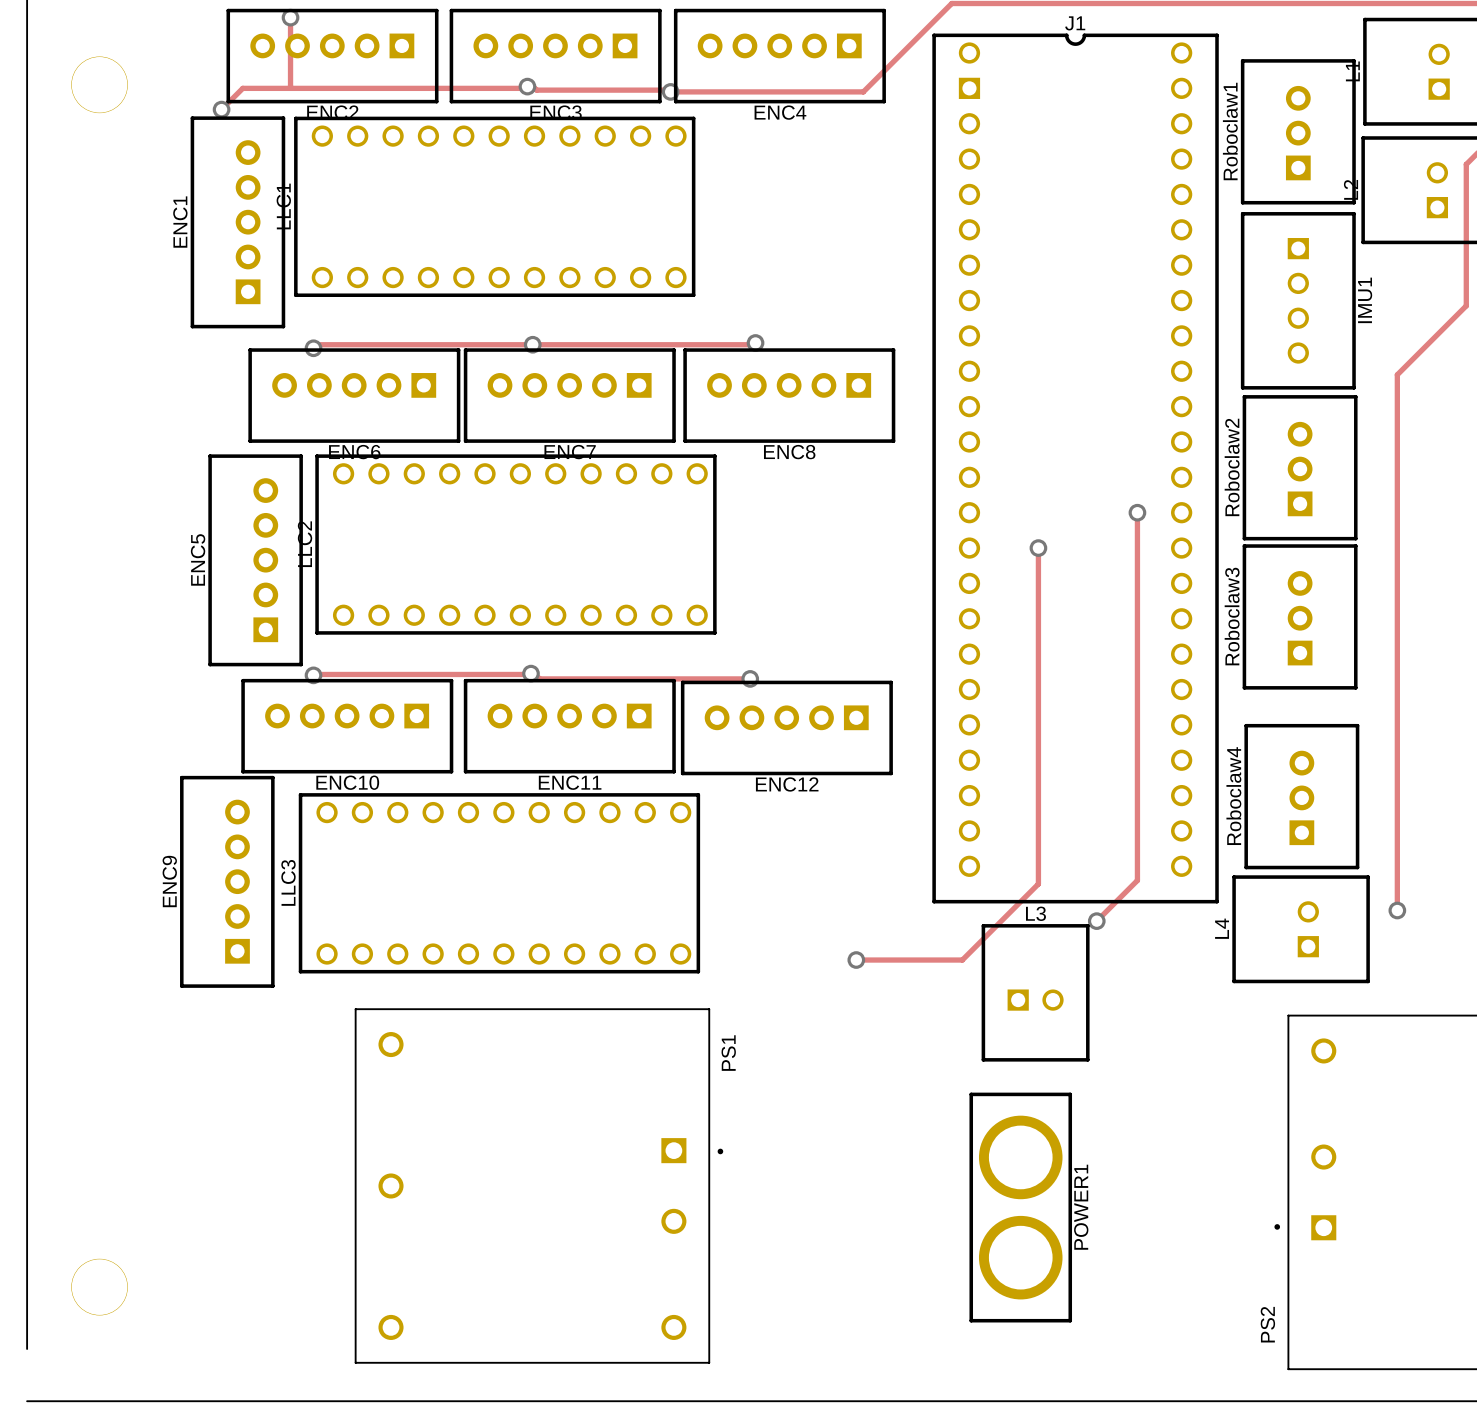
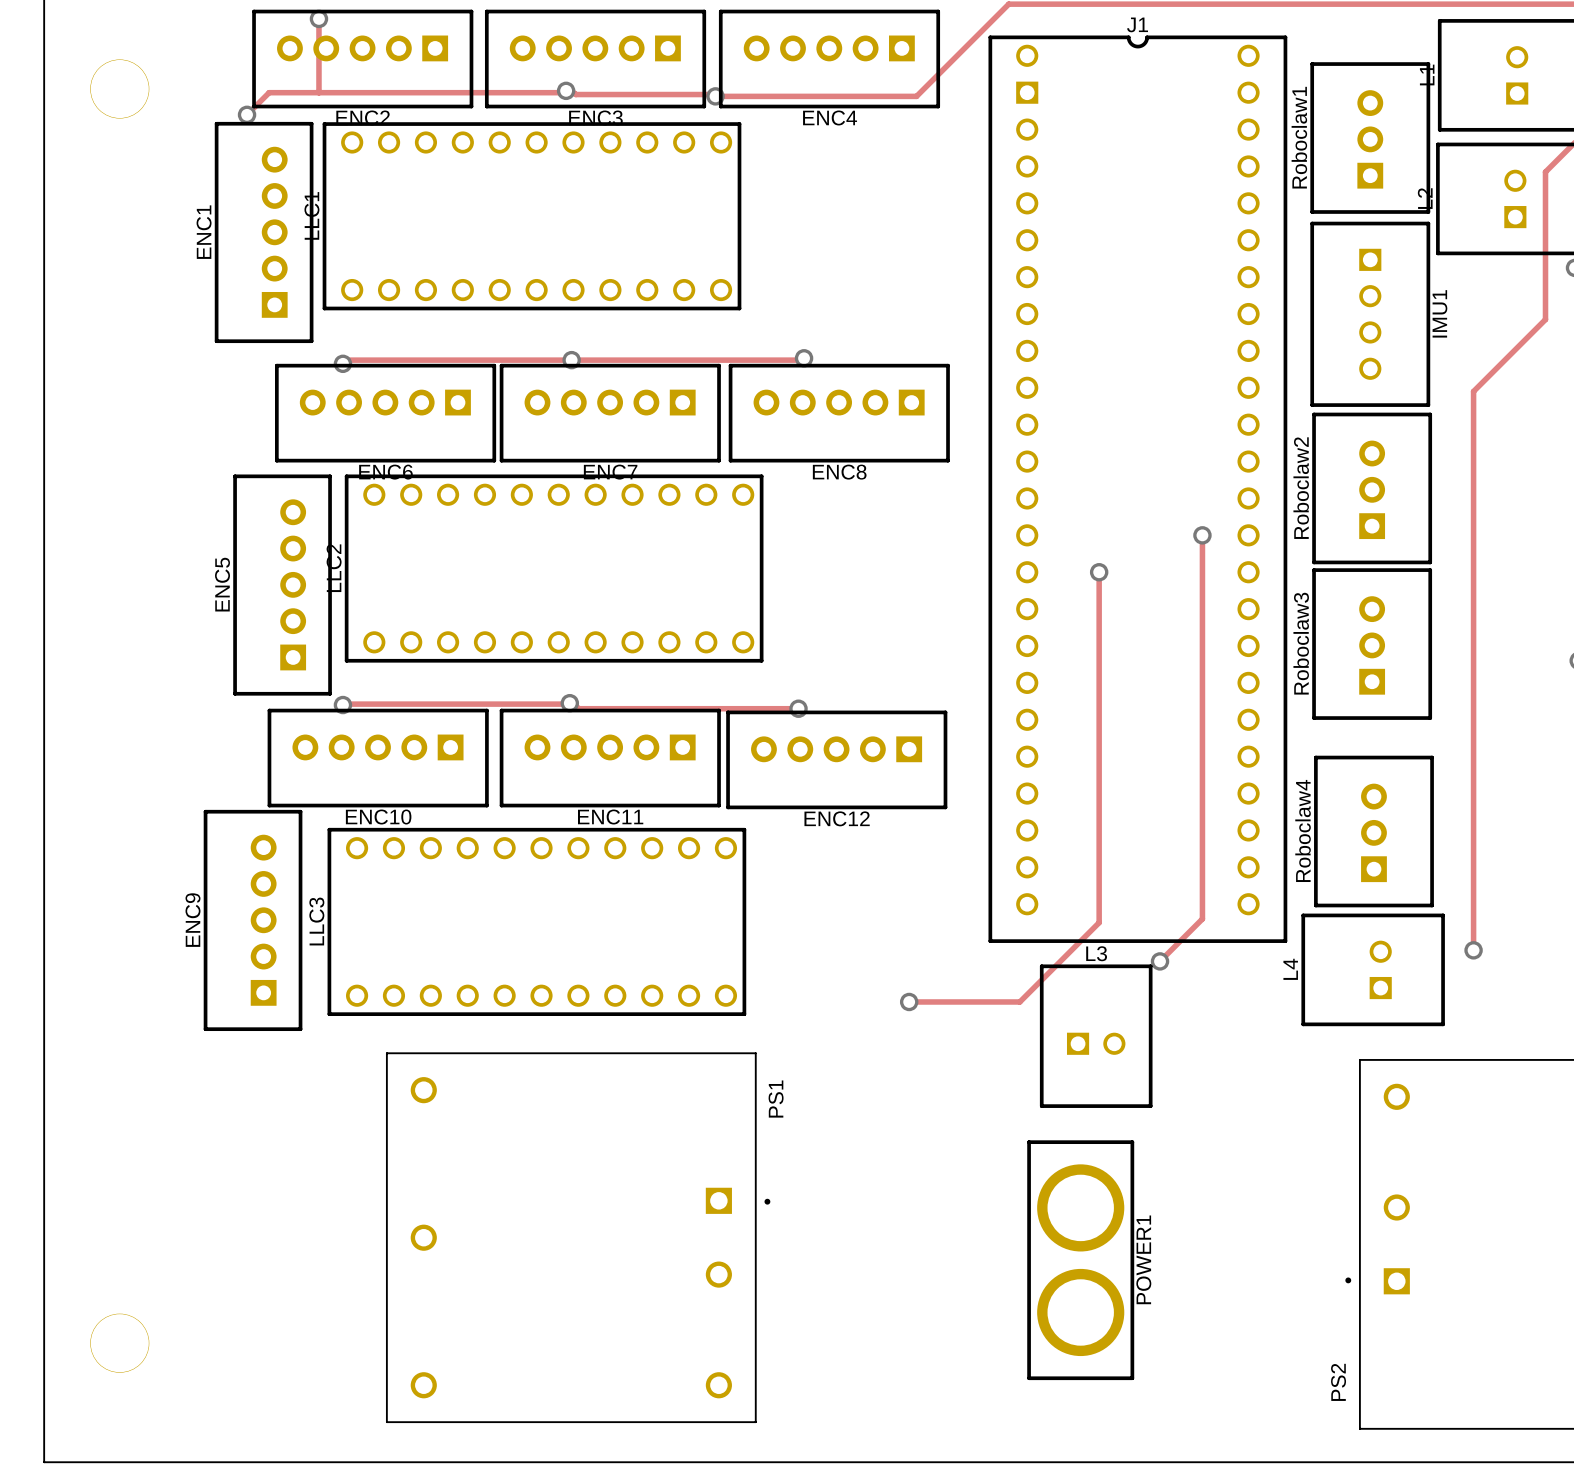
board edge: none -> (44, 1407) (44, 1462)

